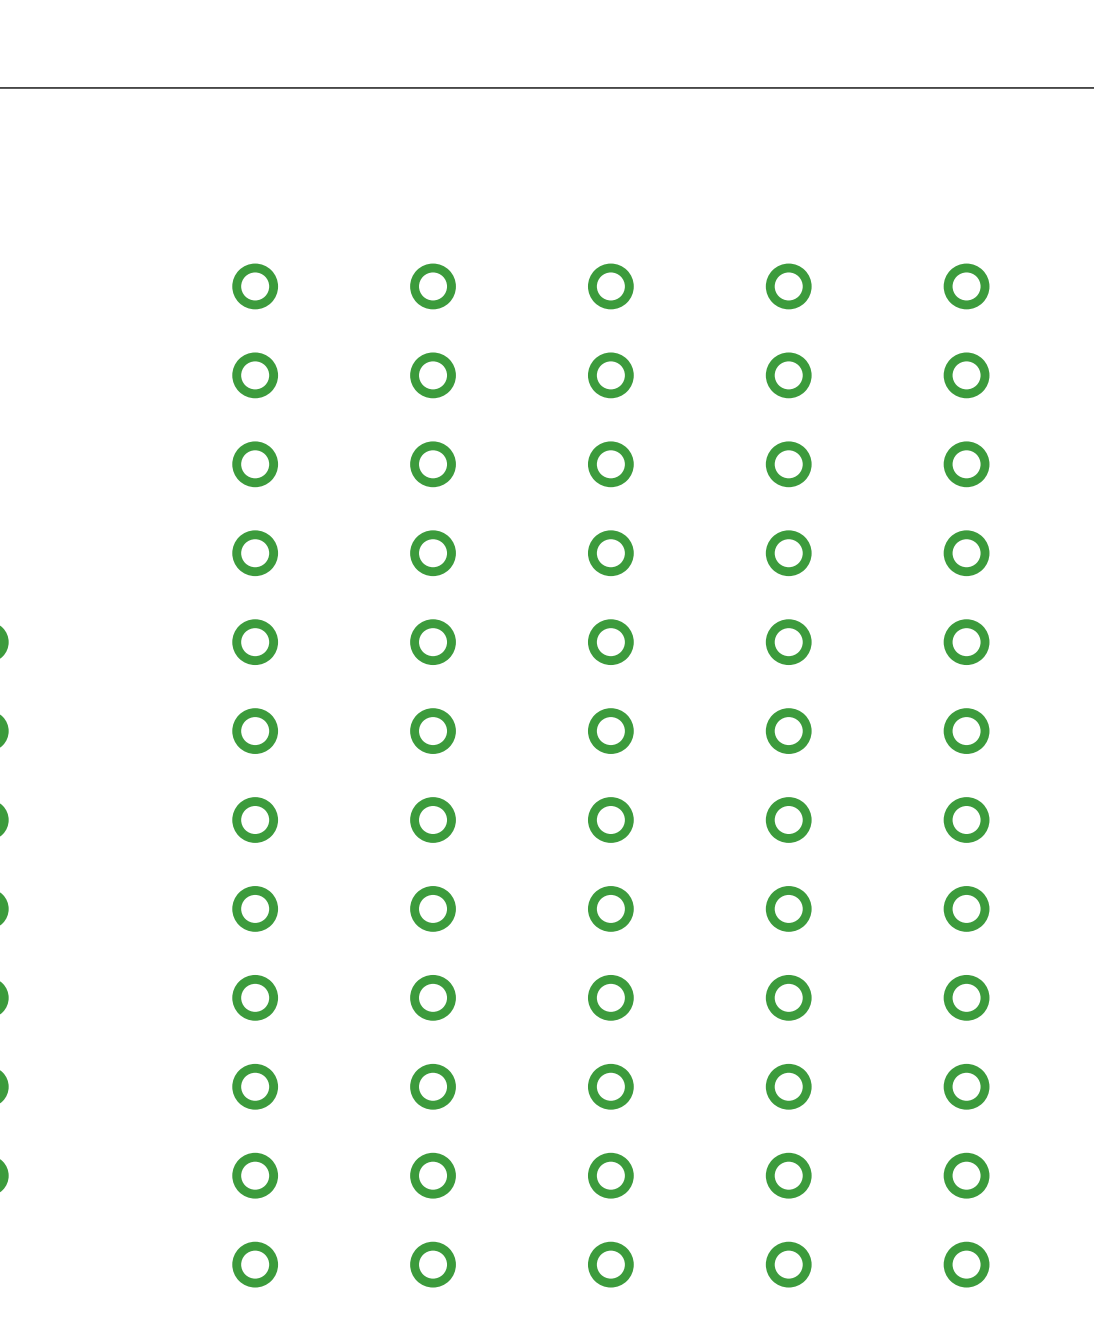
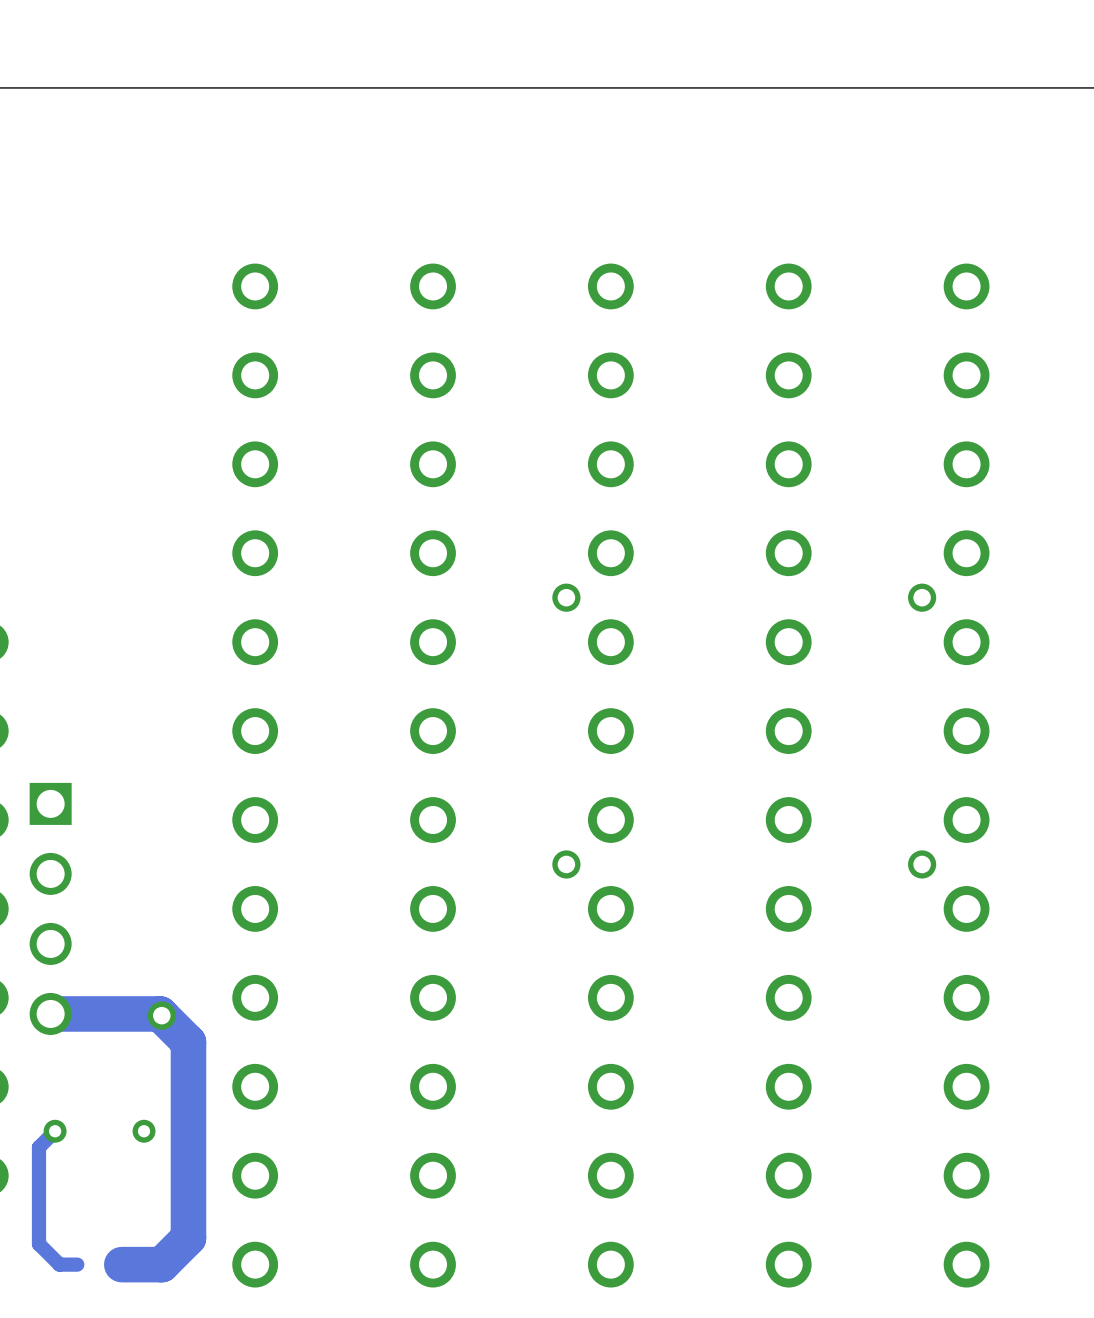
via: none -> (566, 597)
via: none -> (922, 597)
via: none -> (566, 864)
via: none -> (922, 864)
part: none -> (50, 908)
track: none -> (50, 1013) (160, 1013) (188, 1042) (188, 1237) (161, 1264) (121, 1264)
via: none -> (161, 1015)
track: none -> (55, 1131) (38, 1147) (38, 1244) (59, 1264) (77, 1264)
via: none -> (55, 1131)
via: none -> (144, 1131)

